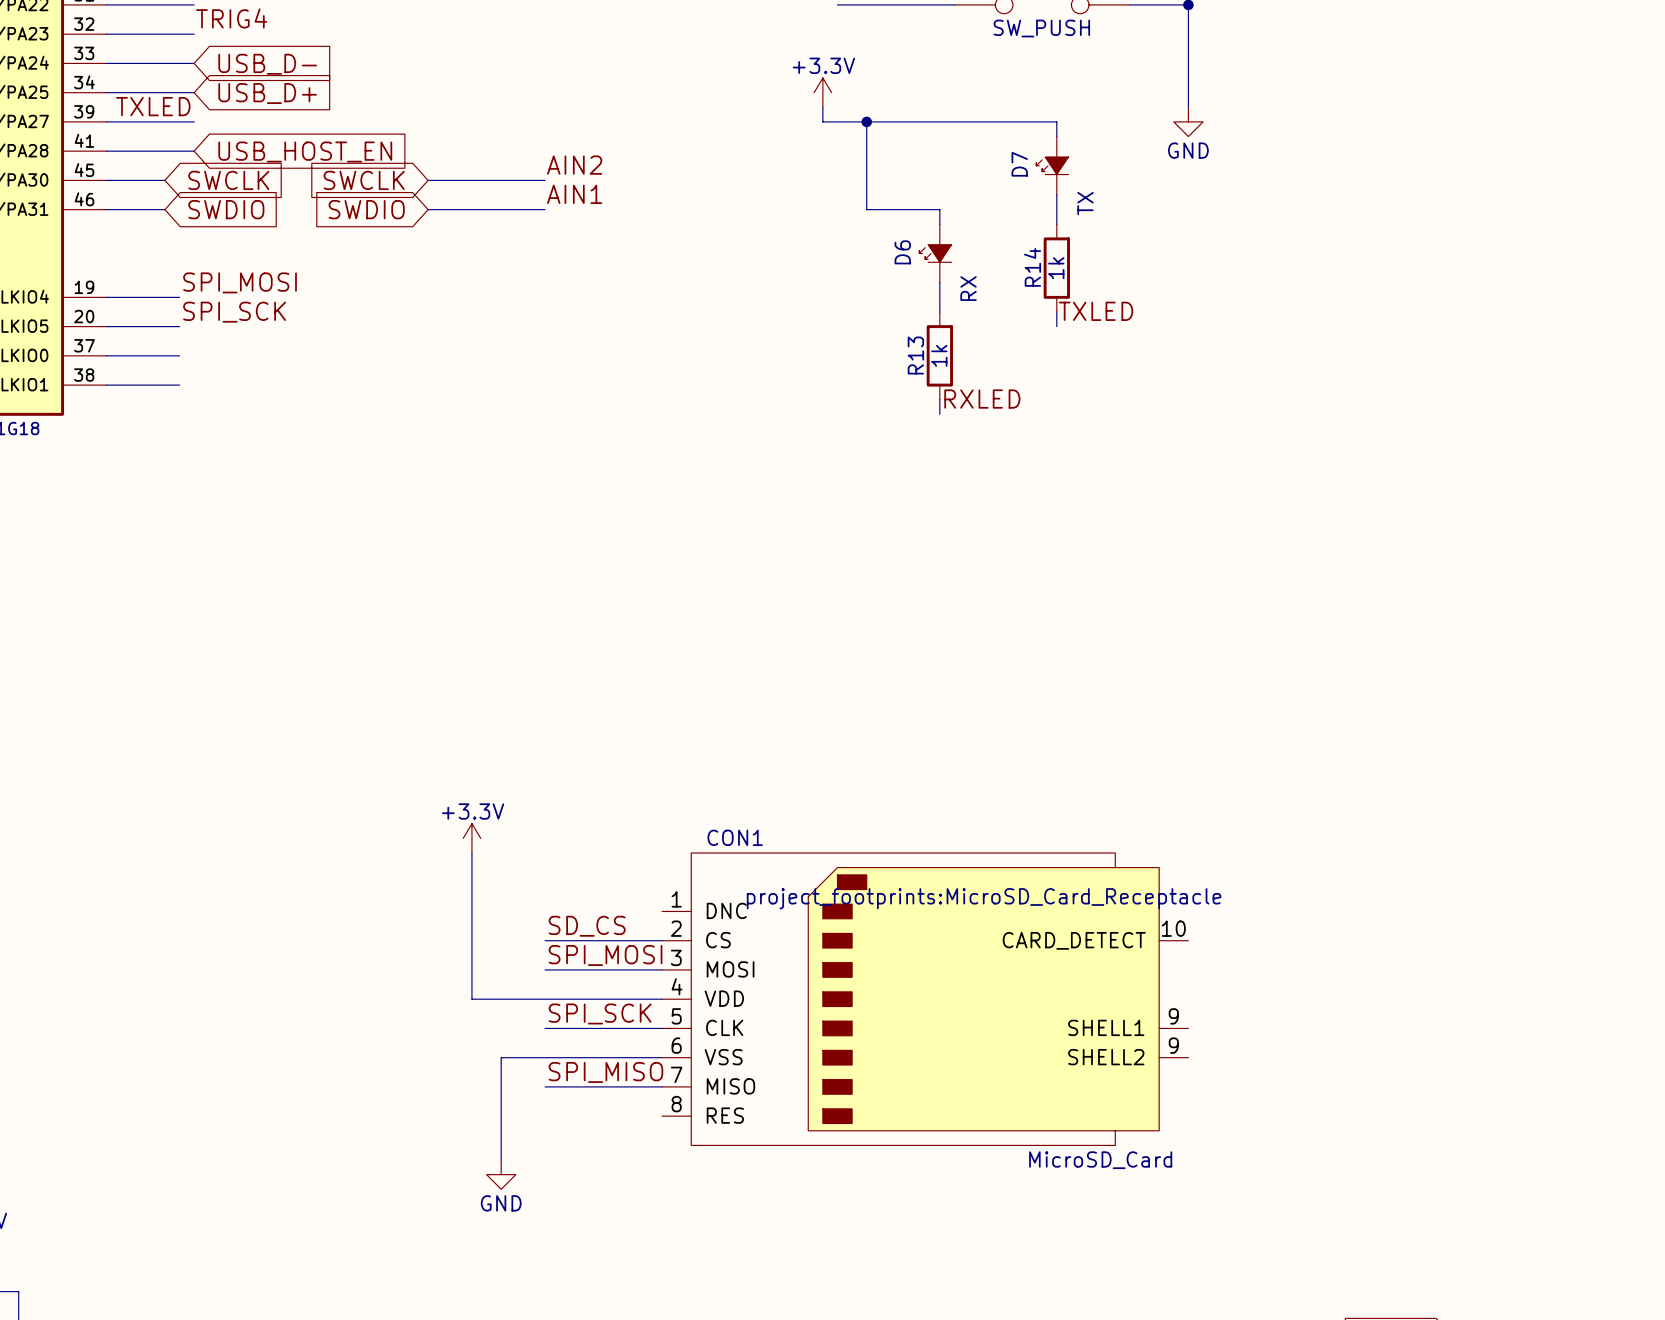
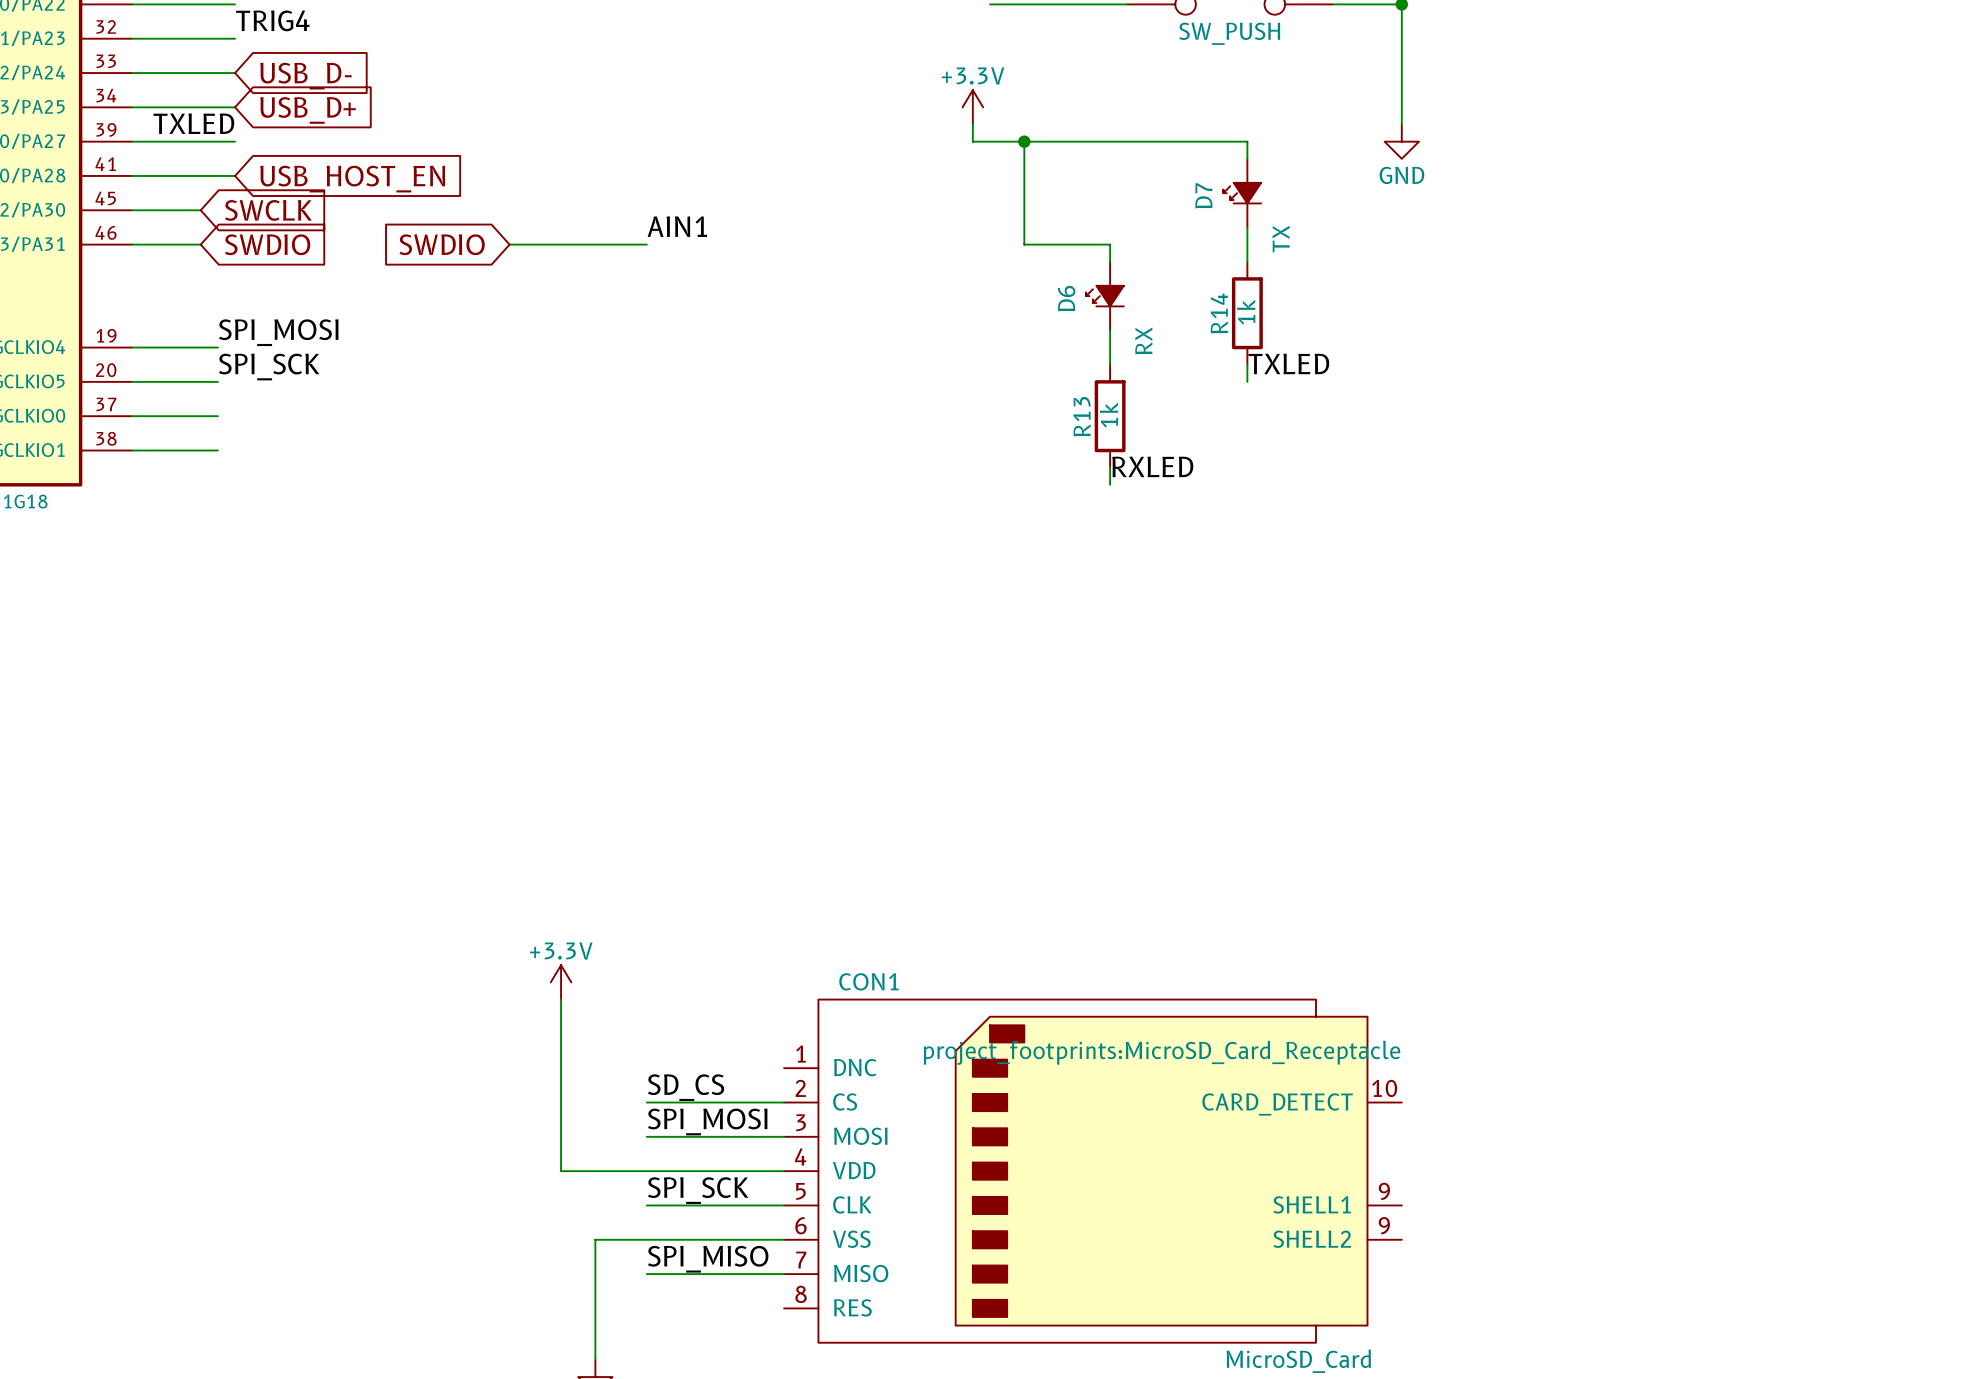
label: AIN2 (574, 165) -> none
global label: SWCLK (364, 180) -> none
wire: (428, 180) (545, 180) -> none

